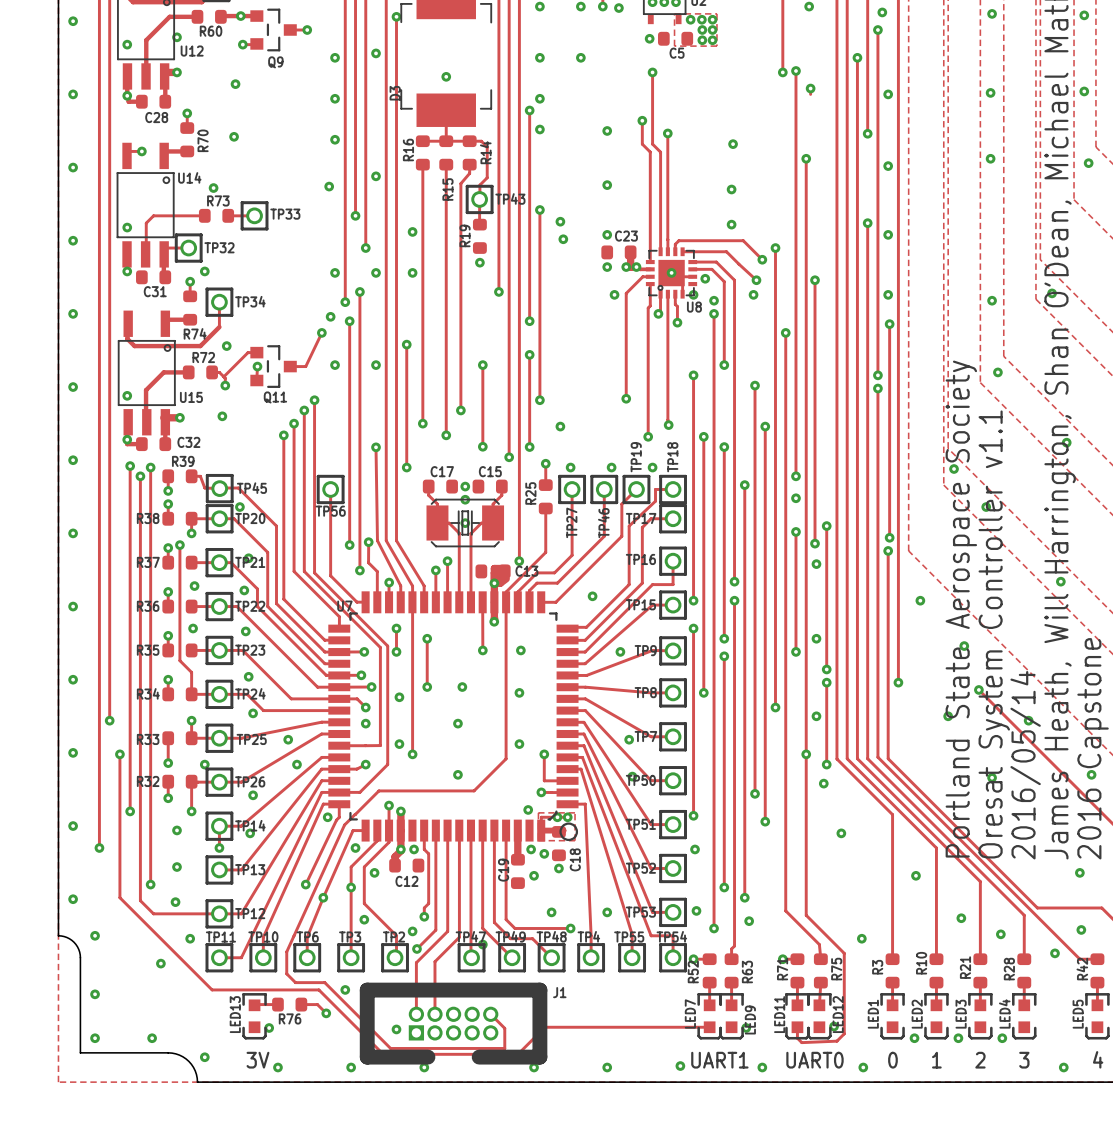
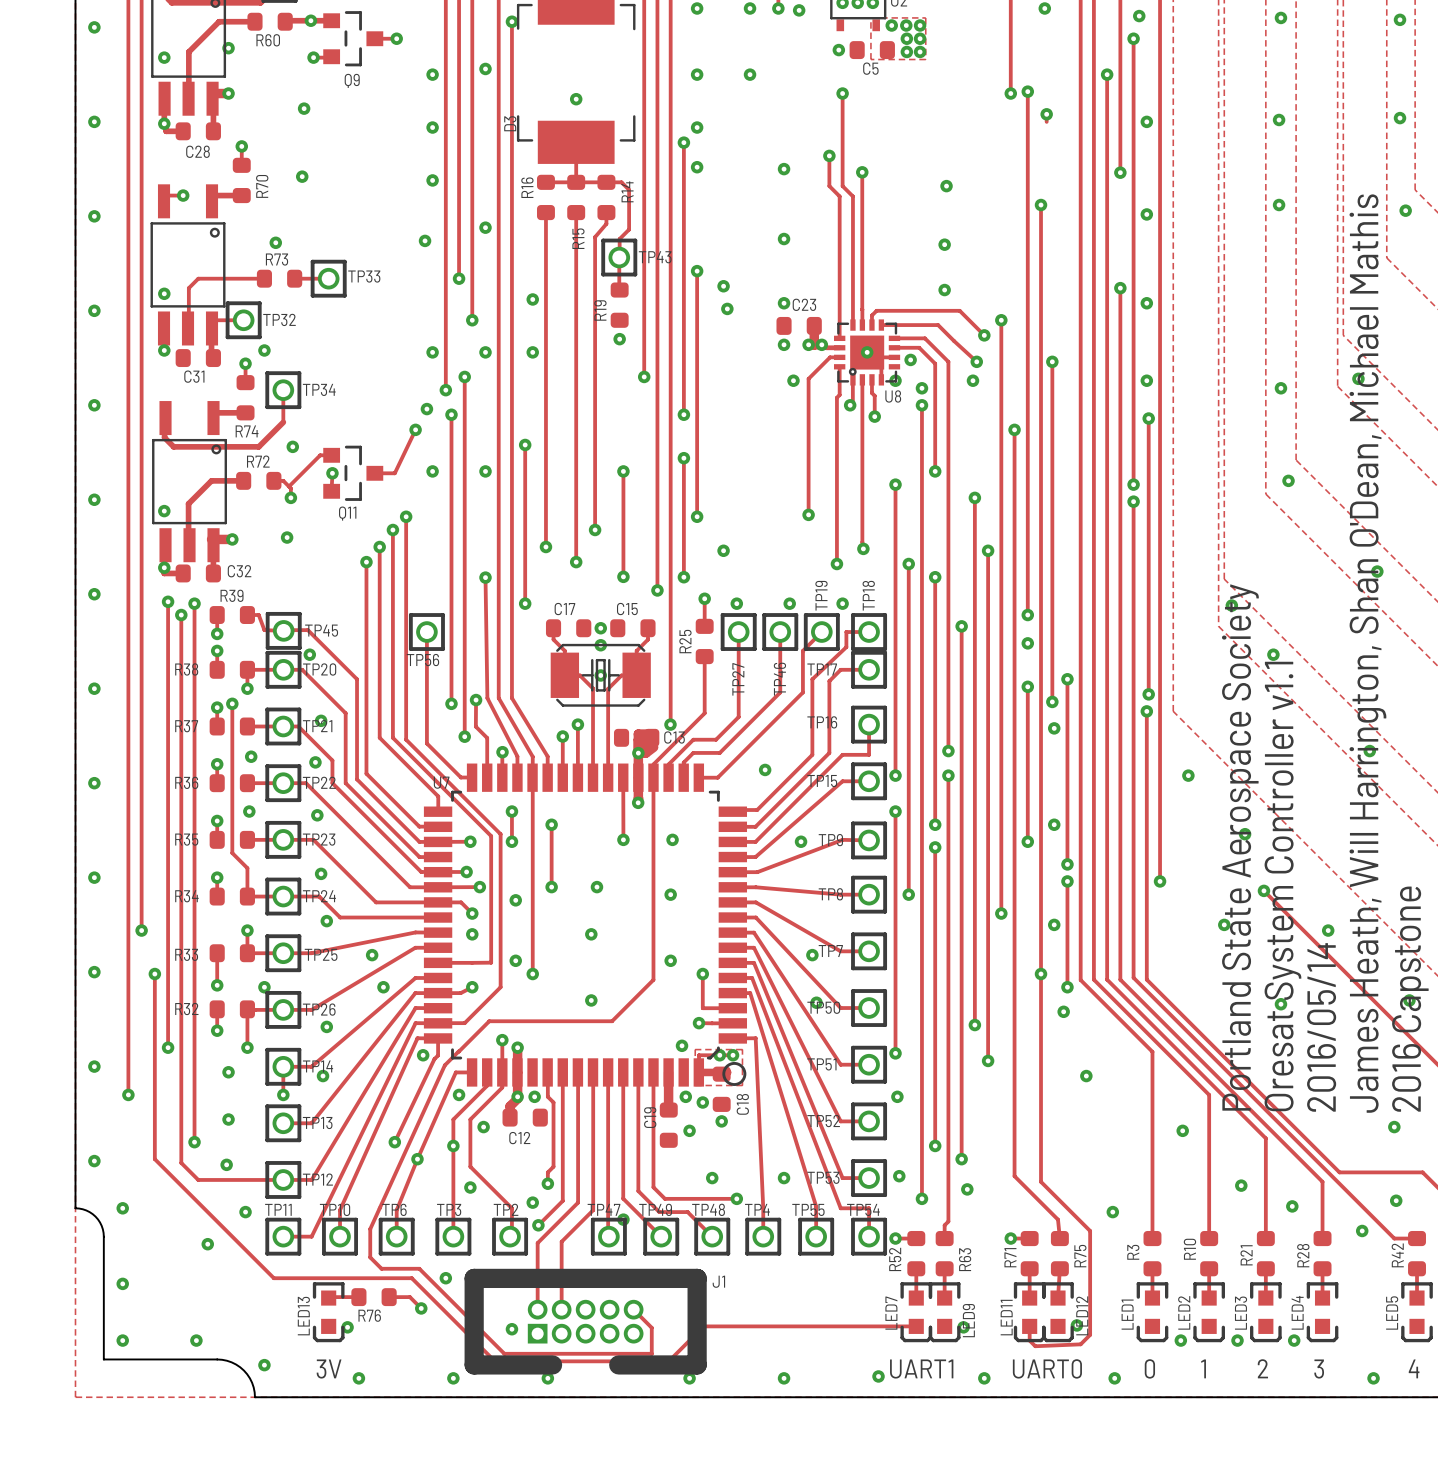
U12 name: U12 (192, 51) -> none
U14 name: U14 (189, 177) -> none
U15 name: U15 (191, 397) -> none

